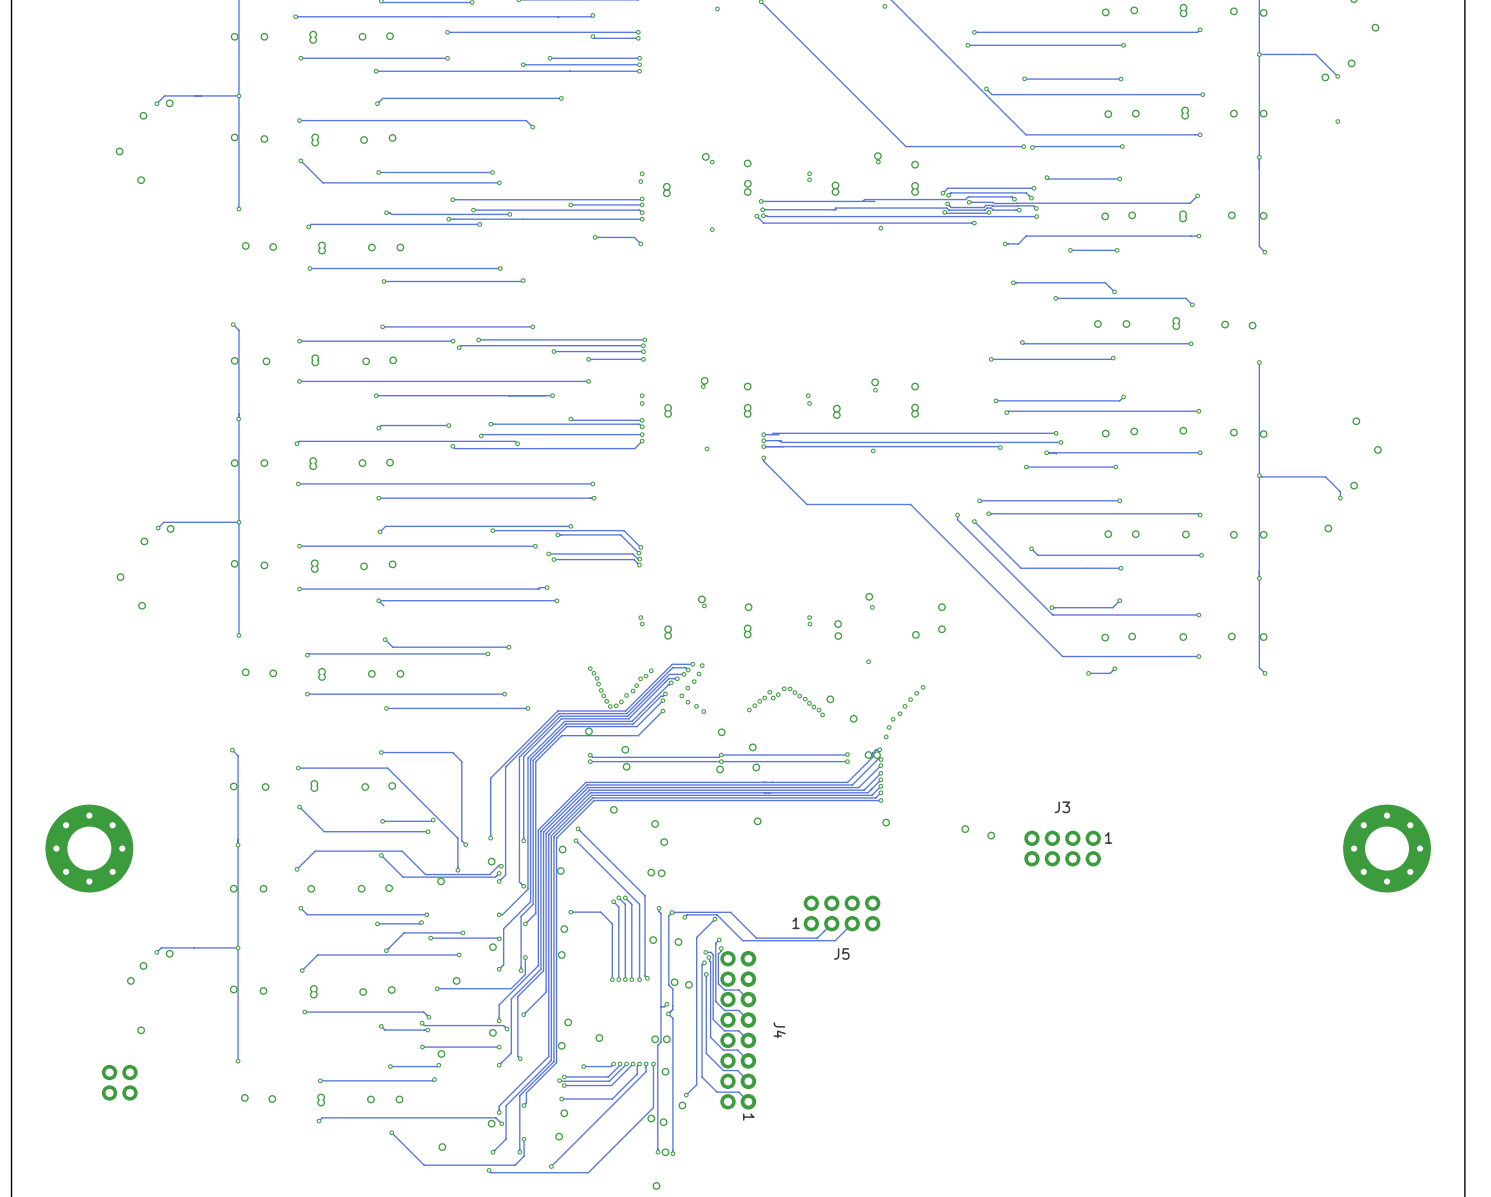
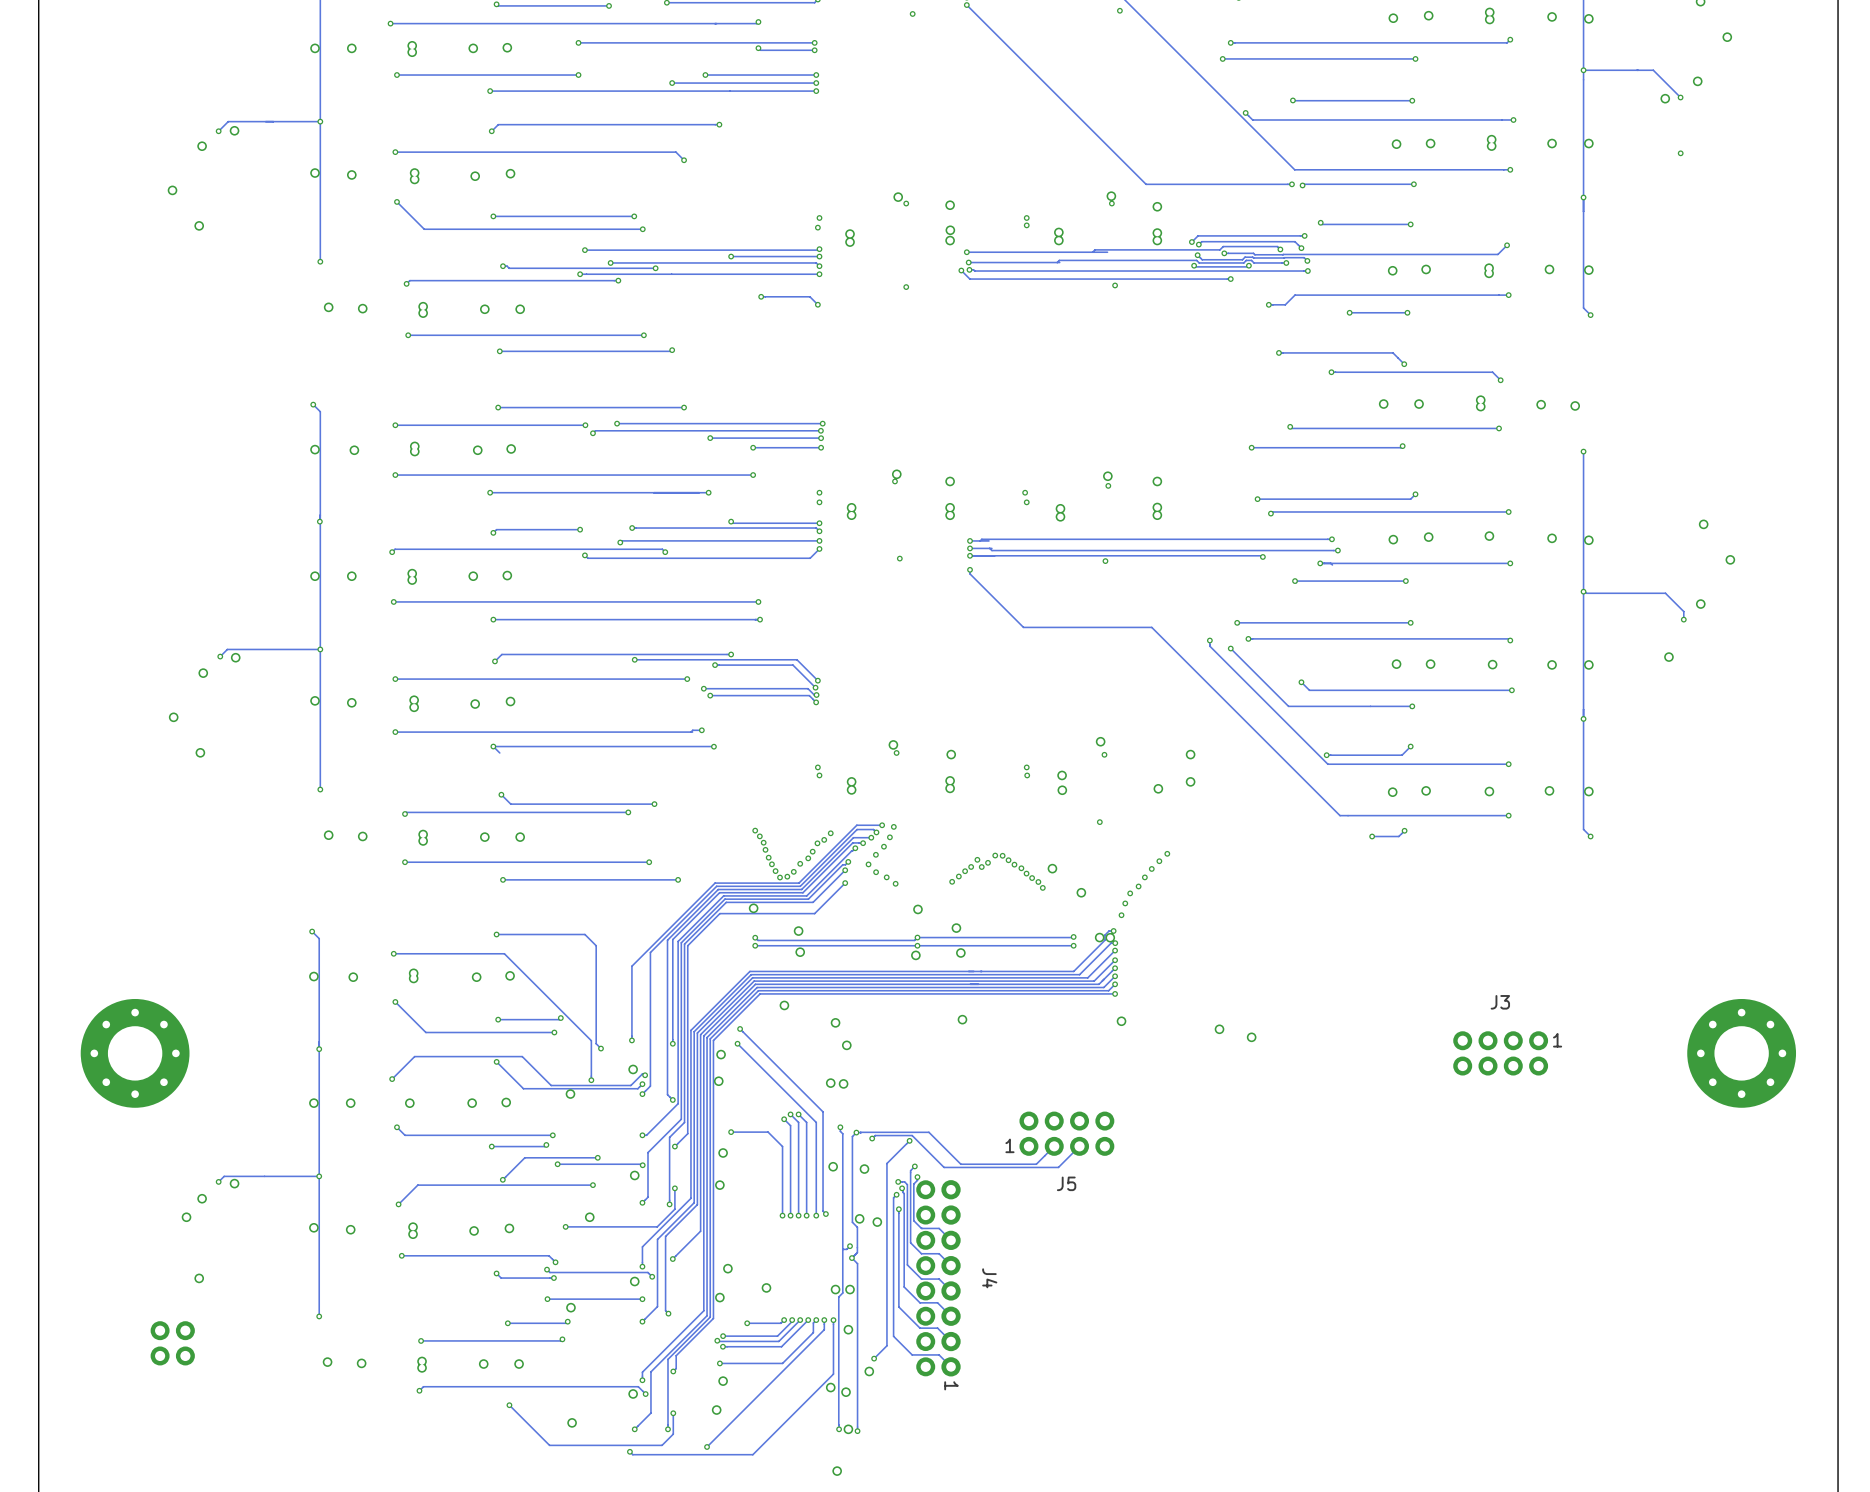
J3 position: (1062, 848) -> (1500, 1053)

